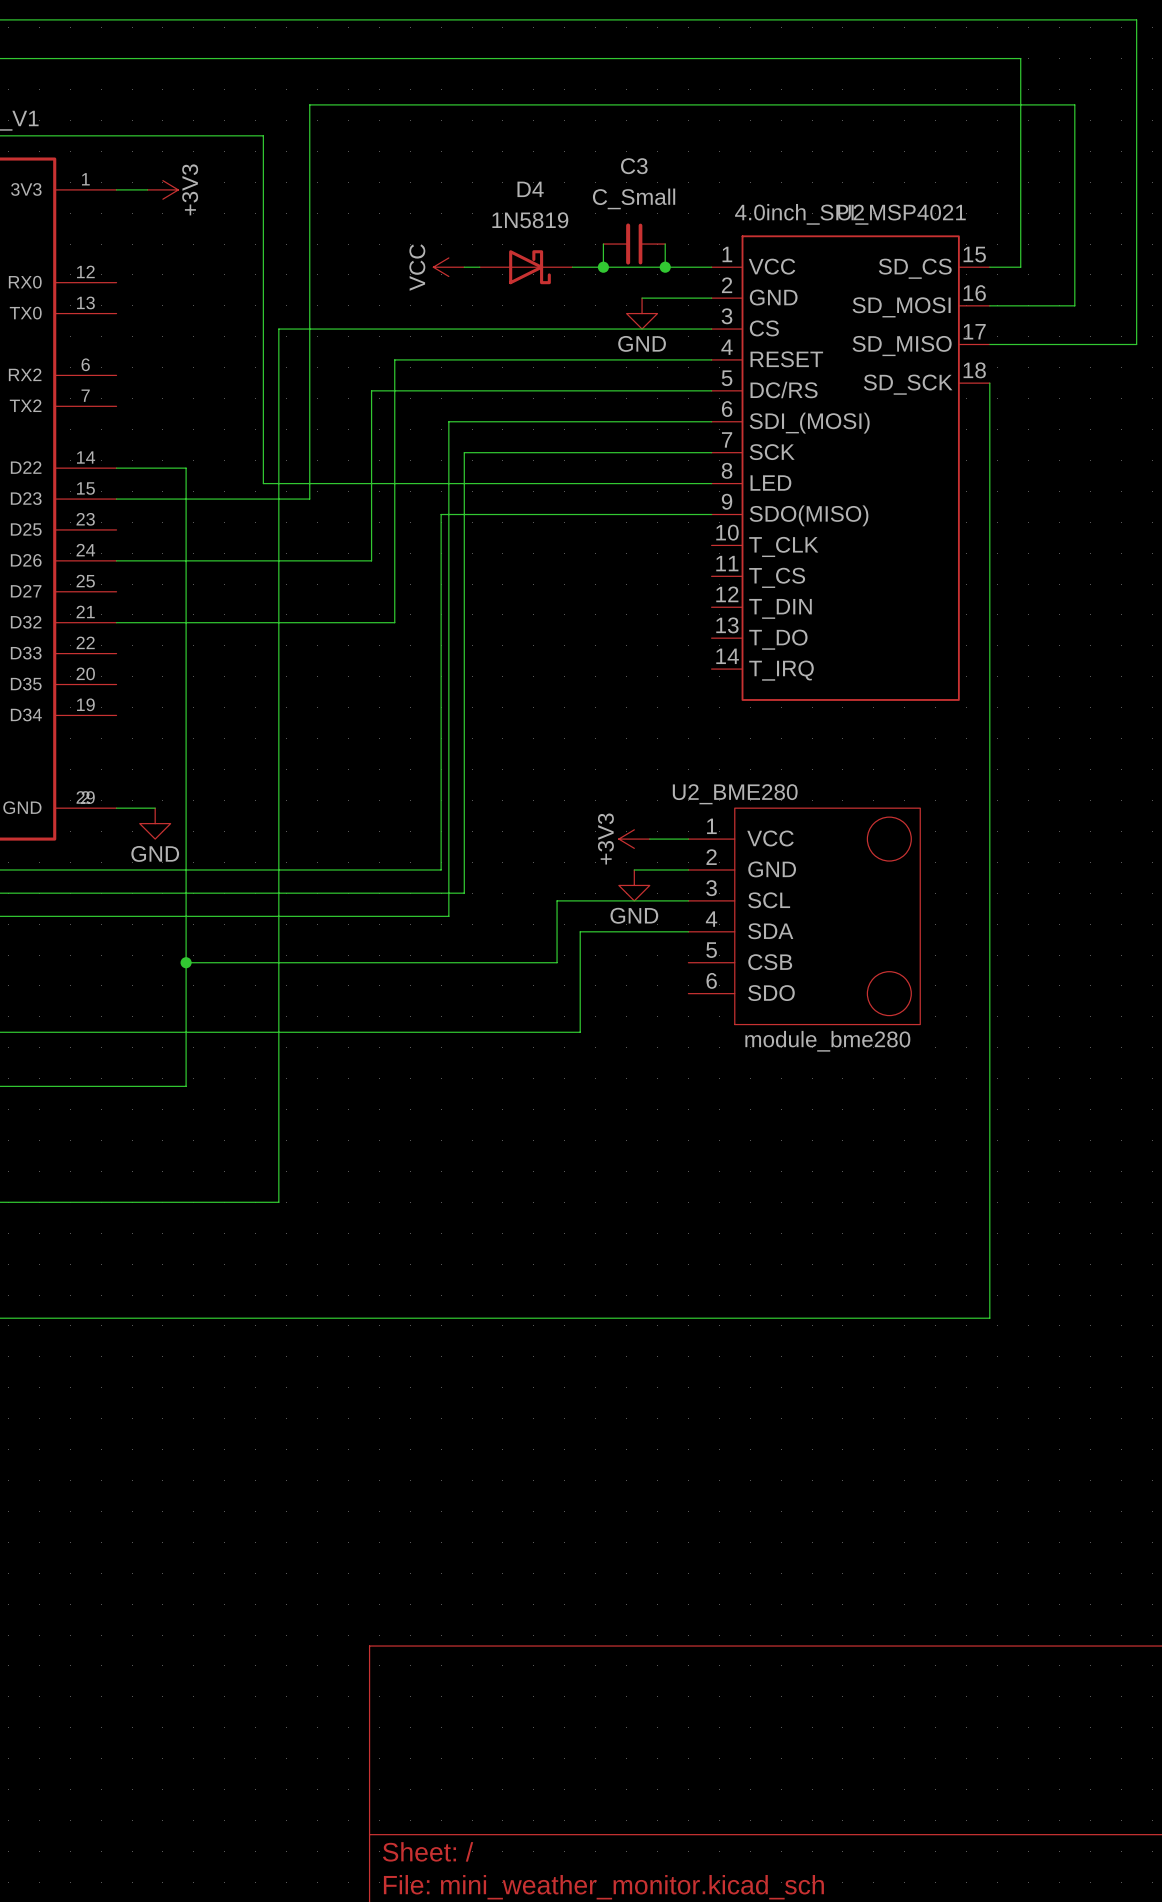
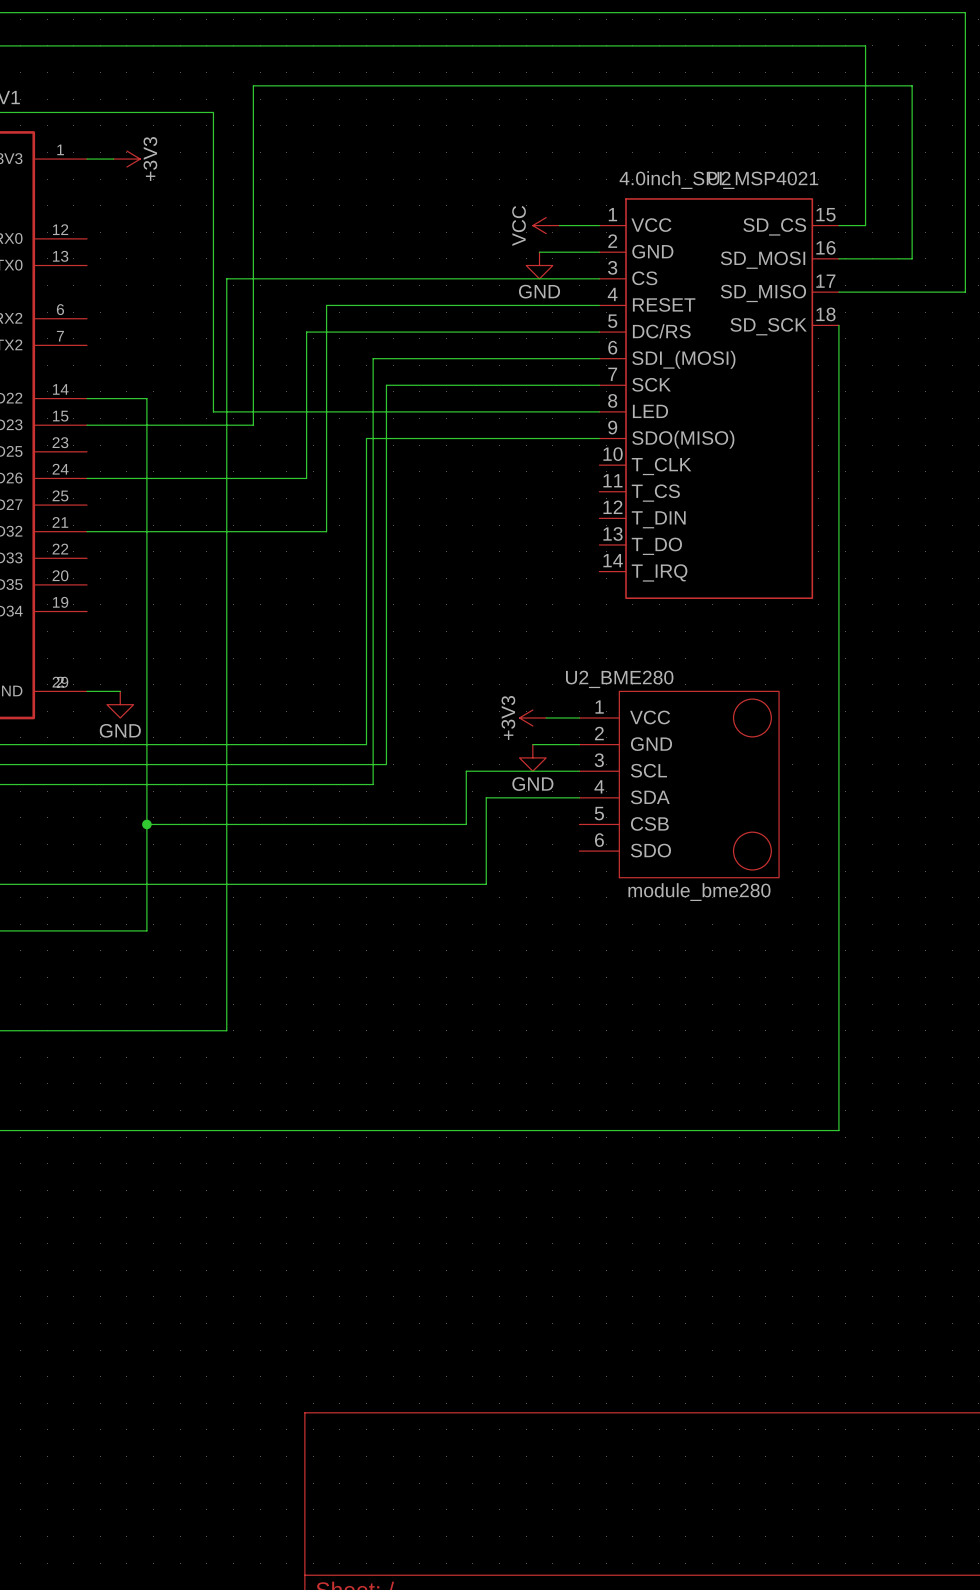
wire: (603, 244) (603, 267) -> none
C3: C_Small (634, 244) -> none
wire: (665, 244) (665, 267) (572, 267) -> none
power symbol position: VCC (448, 267) -> VCC (546, 225)
wire: (464, 267) (479, 267) -> none
D4: 1N5819 (526, 267) -> none
junction: (603, 267) -> none
junction: (665, 267) -> none

